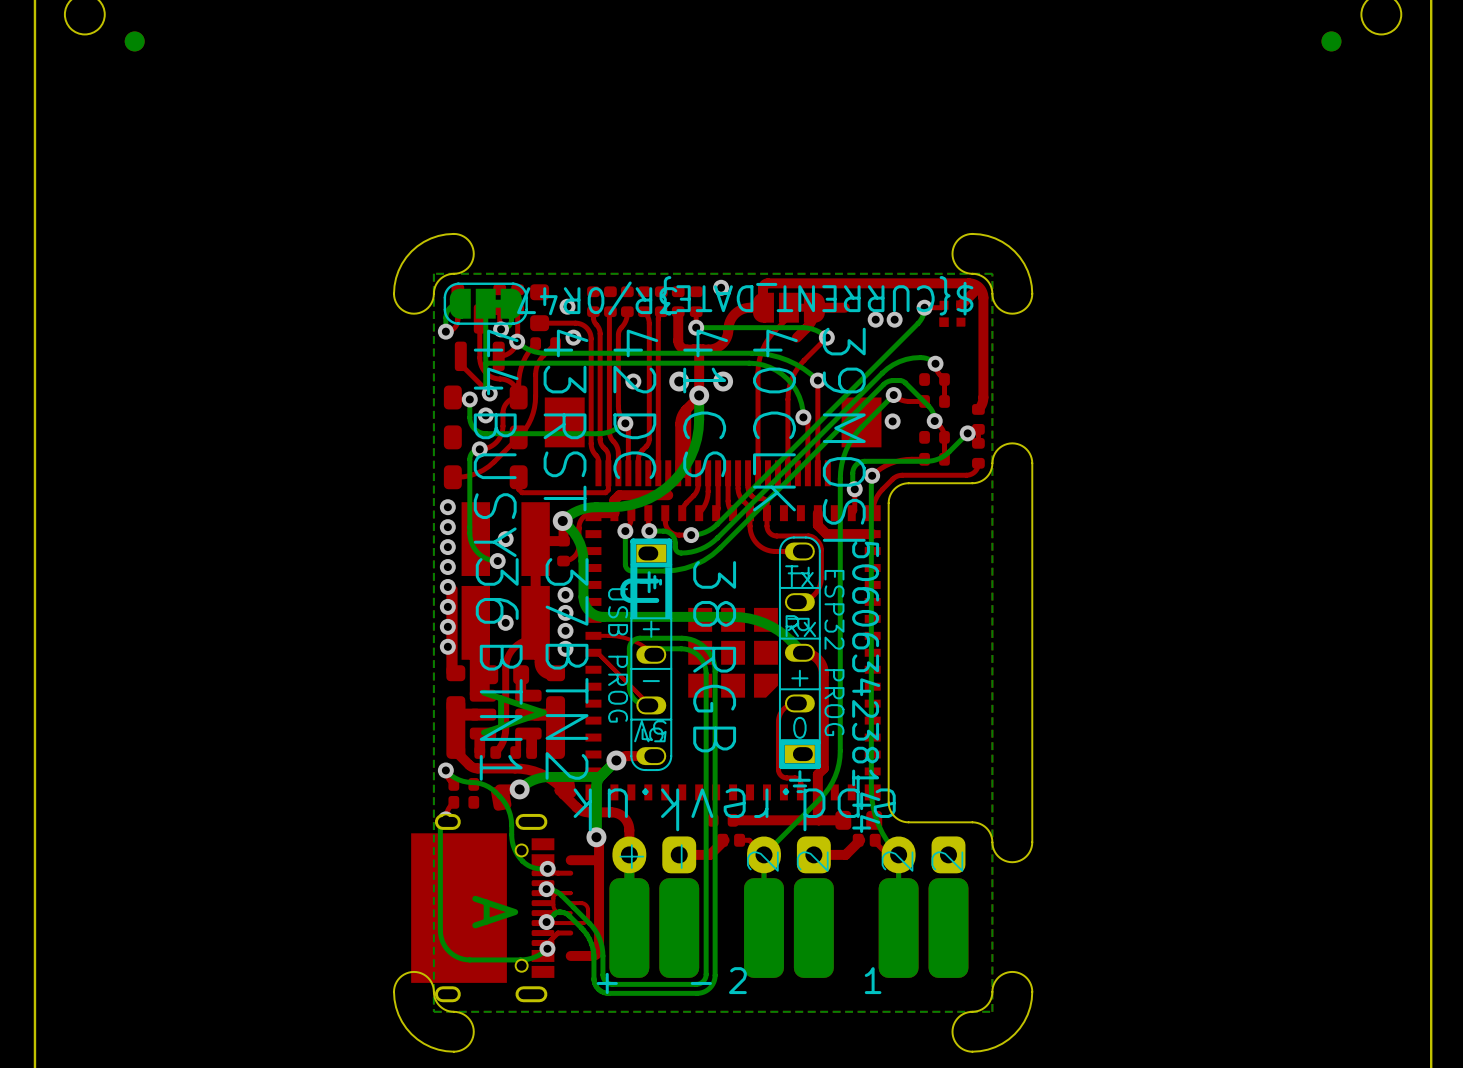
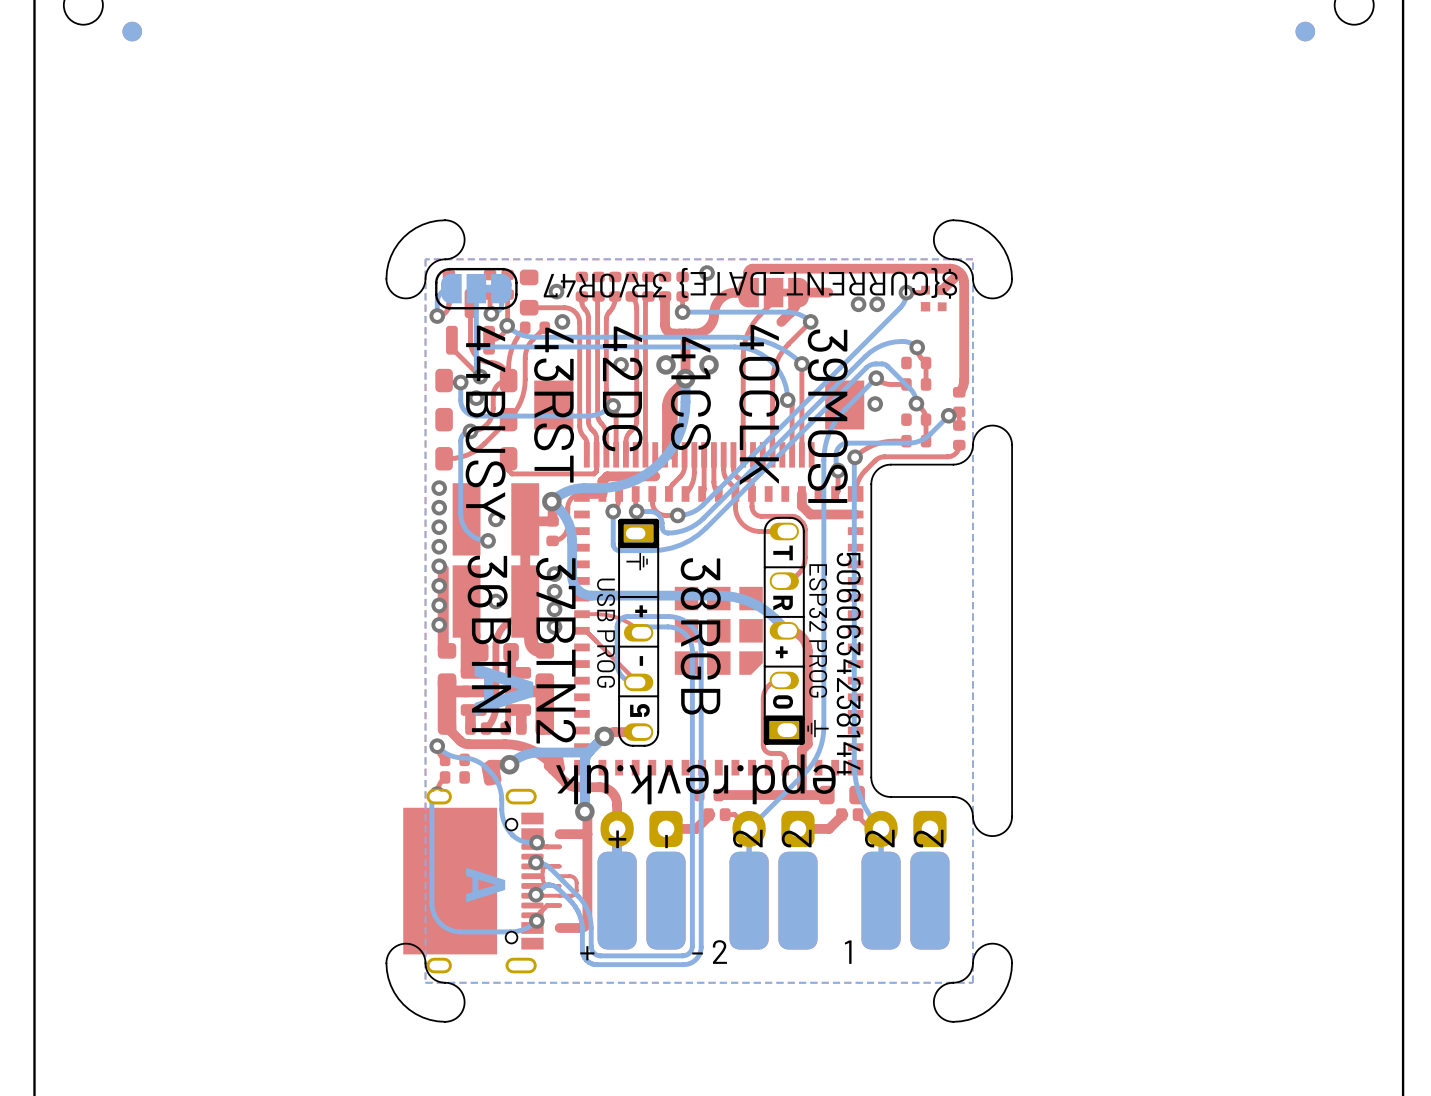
part footprint: [778, 536, 821, 770] -> [763, 516, 805, 745]
part footprint: [630, 538, 673, 772] -> [618, 518, 660, 747]

